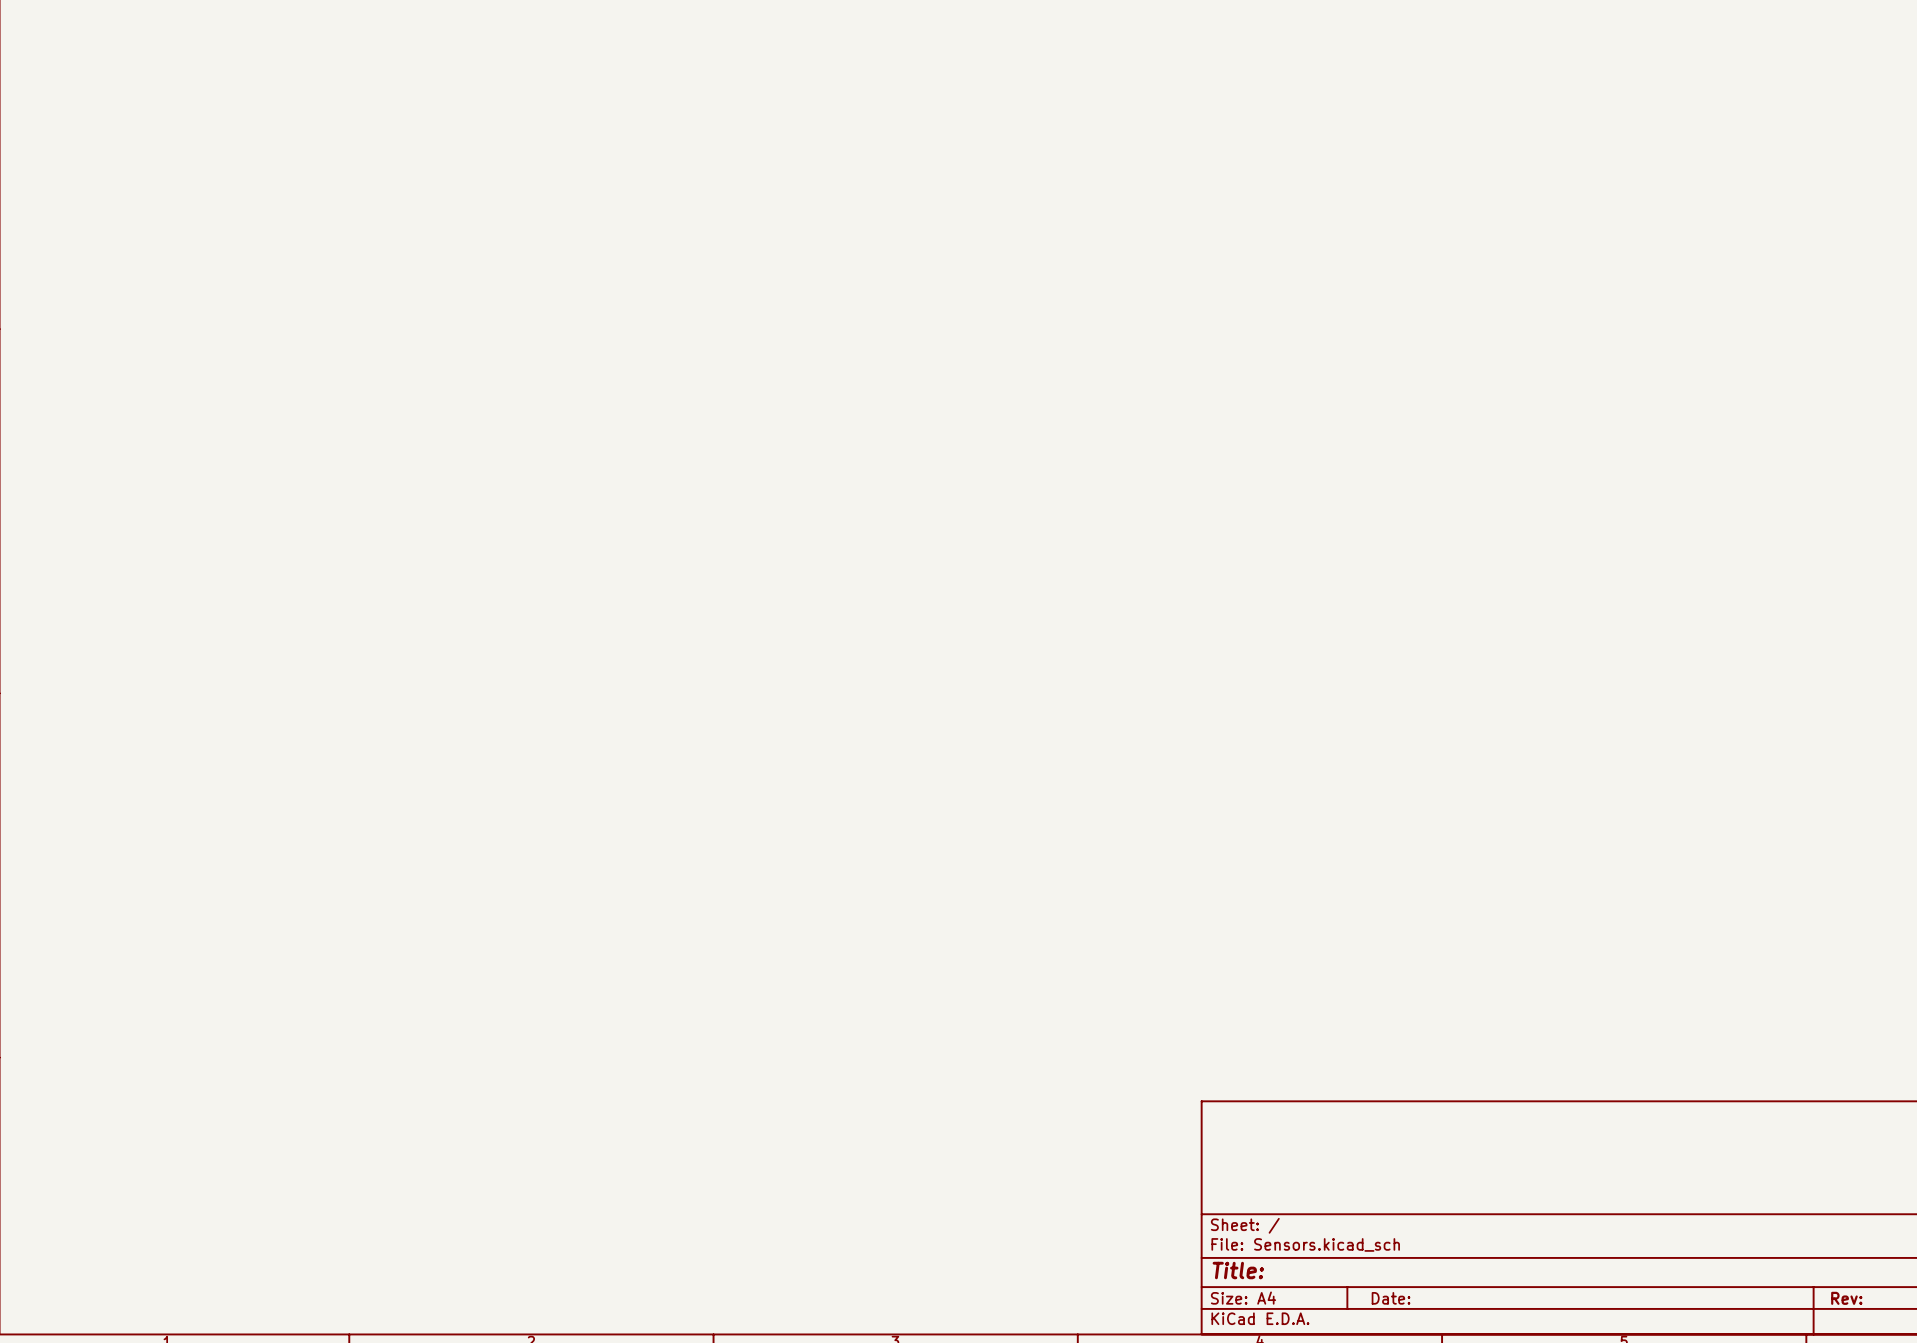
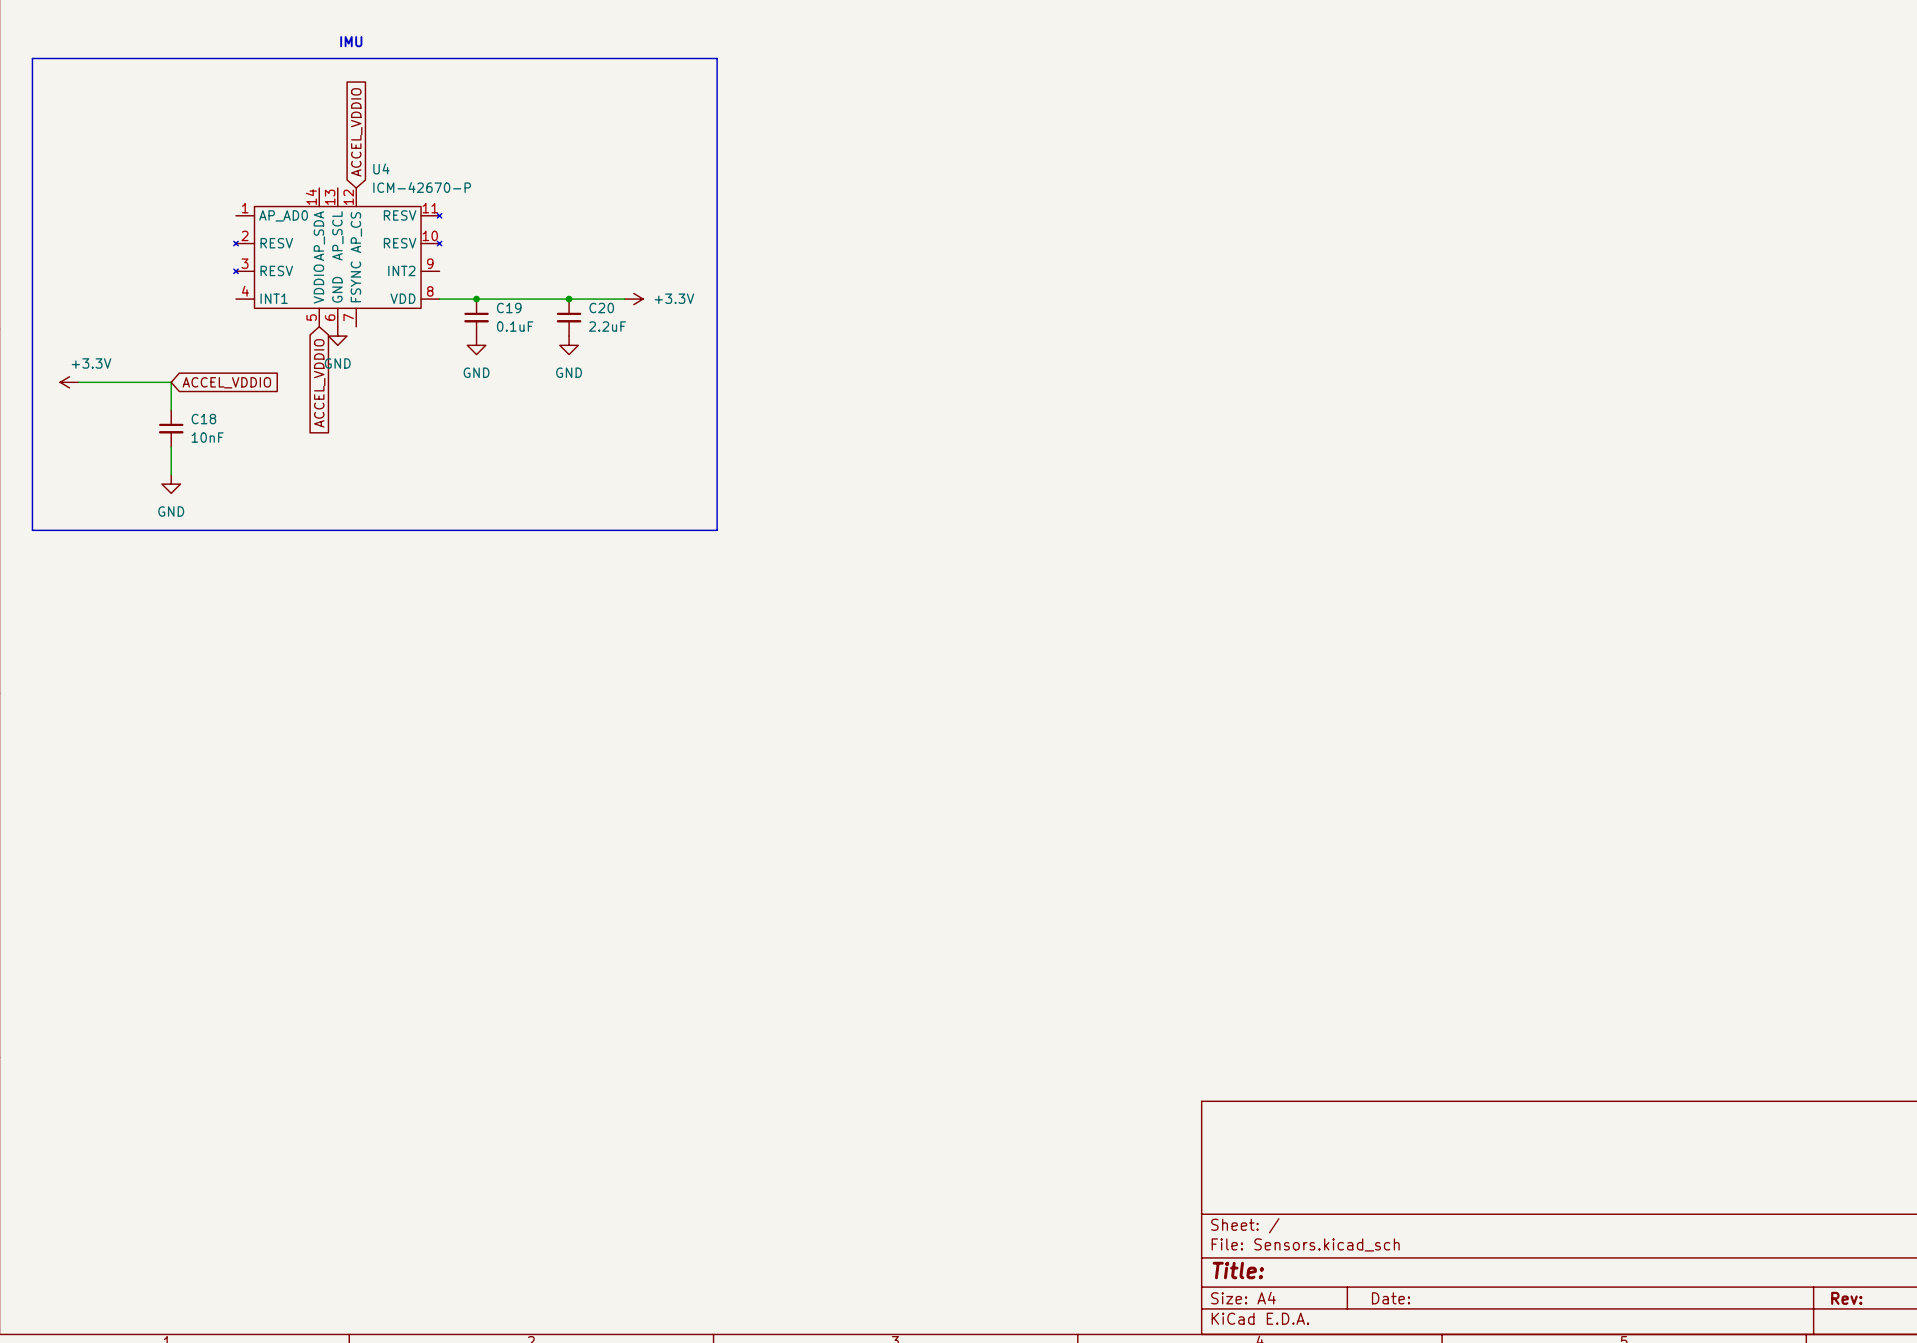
text: none -> IMU (351, 41)
line: none -> (32, 58) (717, 58) (717, 530) (32, 530) (32, 58)
global label: none -> ACCEL_VDDIO (356, 132)
U4: none -> ICM-42670-P (337, 257)
wire: none -> (439, 299) (624, 299)
junction: none -> (476, 299)
junction: none -> (569, 299)
power symbol: none -> +3.3V (633, 299)
C19: none -> 0.1uF (476, 317)
C20: none -> 2.2uF (569, 317)
power symbol: none -> GND (337, 336)
power symbol: none -> GND (476, 345)
power symbol: none -> GND (569, 345)
power symbol: none -> +3.3V (69, 382)
wire: none -> (78, 382) (171, 382) (171, 410)
global label: none -> ACCEL_VDDIO (226, 382)
global label: none -> ACCEL_VDDIO (319, 383)
C18: none -> 10nF (171, 428)
wire: none -> (171, 447) (171, 474)
power symbol: none -> GND (171, 484)

